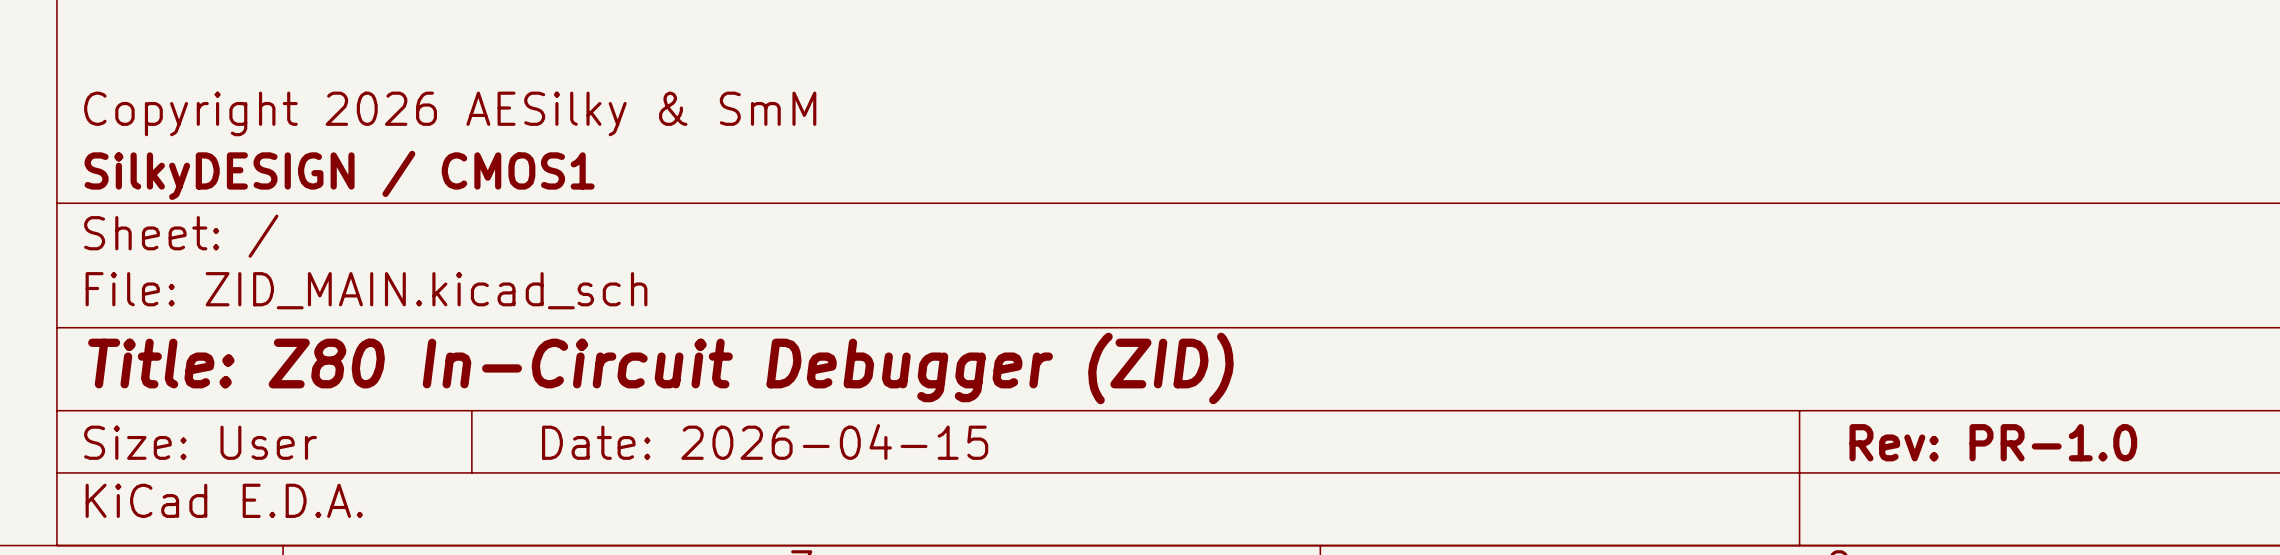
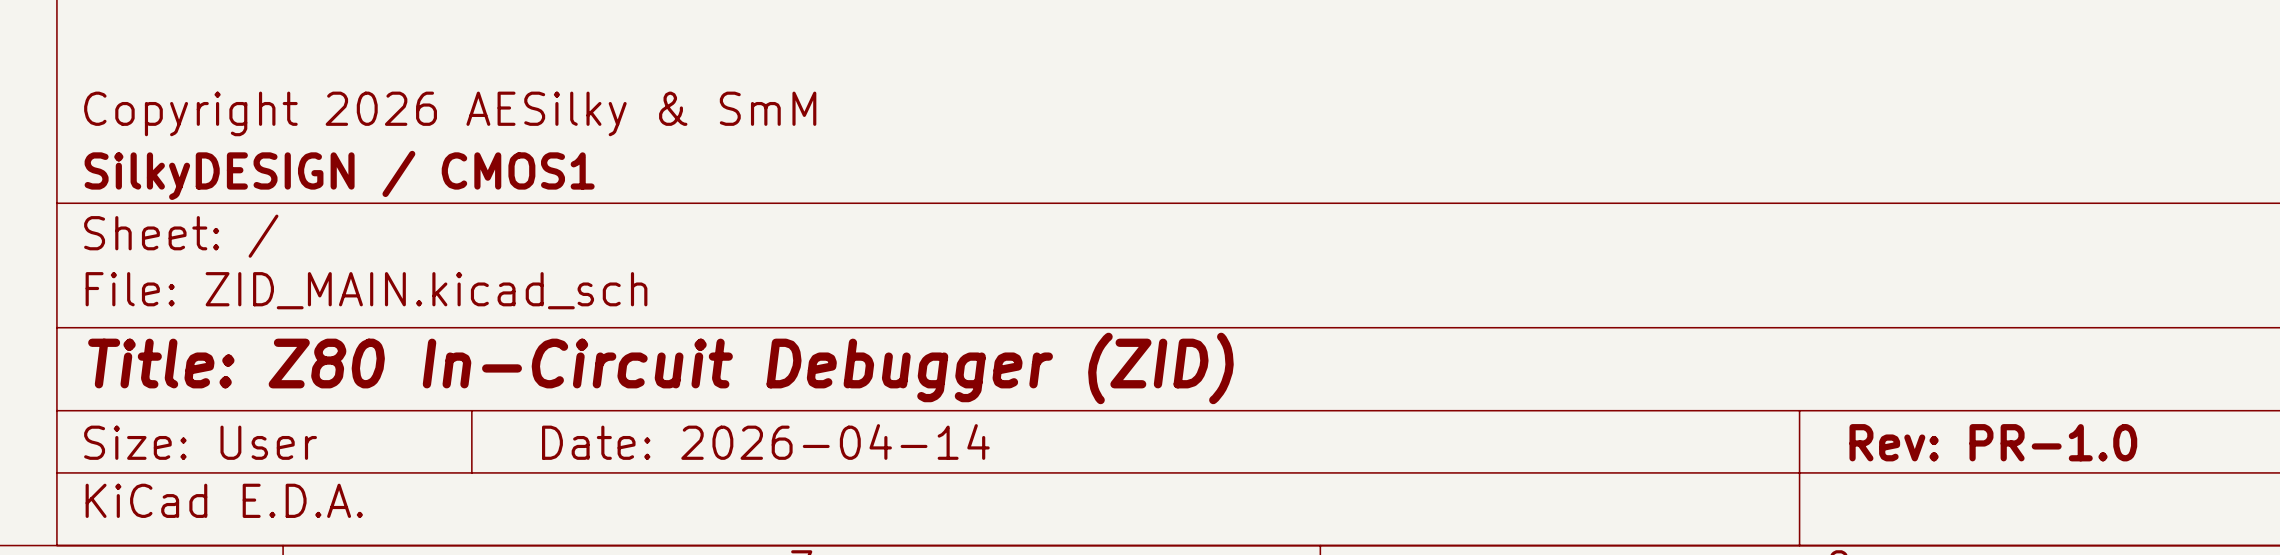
title block: Date: 2026-04-15 (765, 441) -> Date: 2026-04-14 (765, 441)

